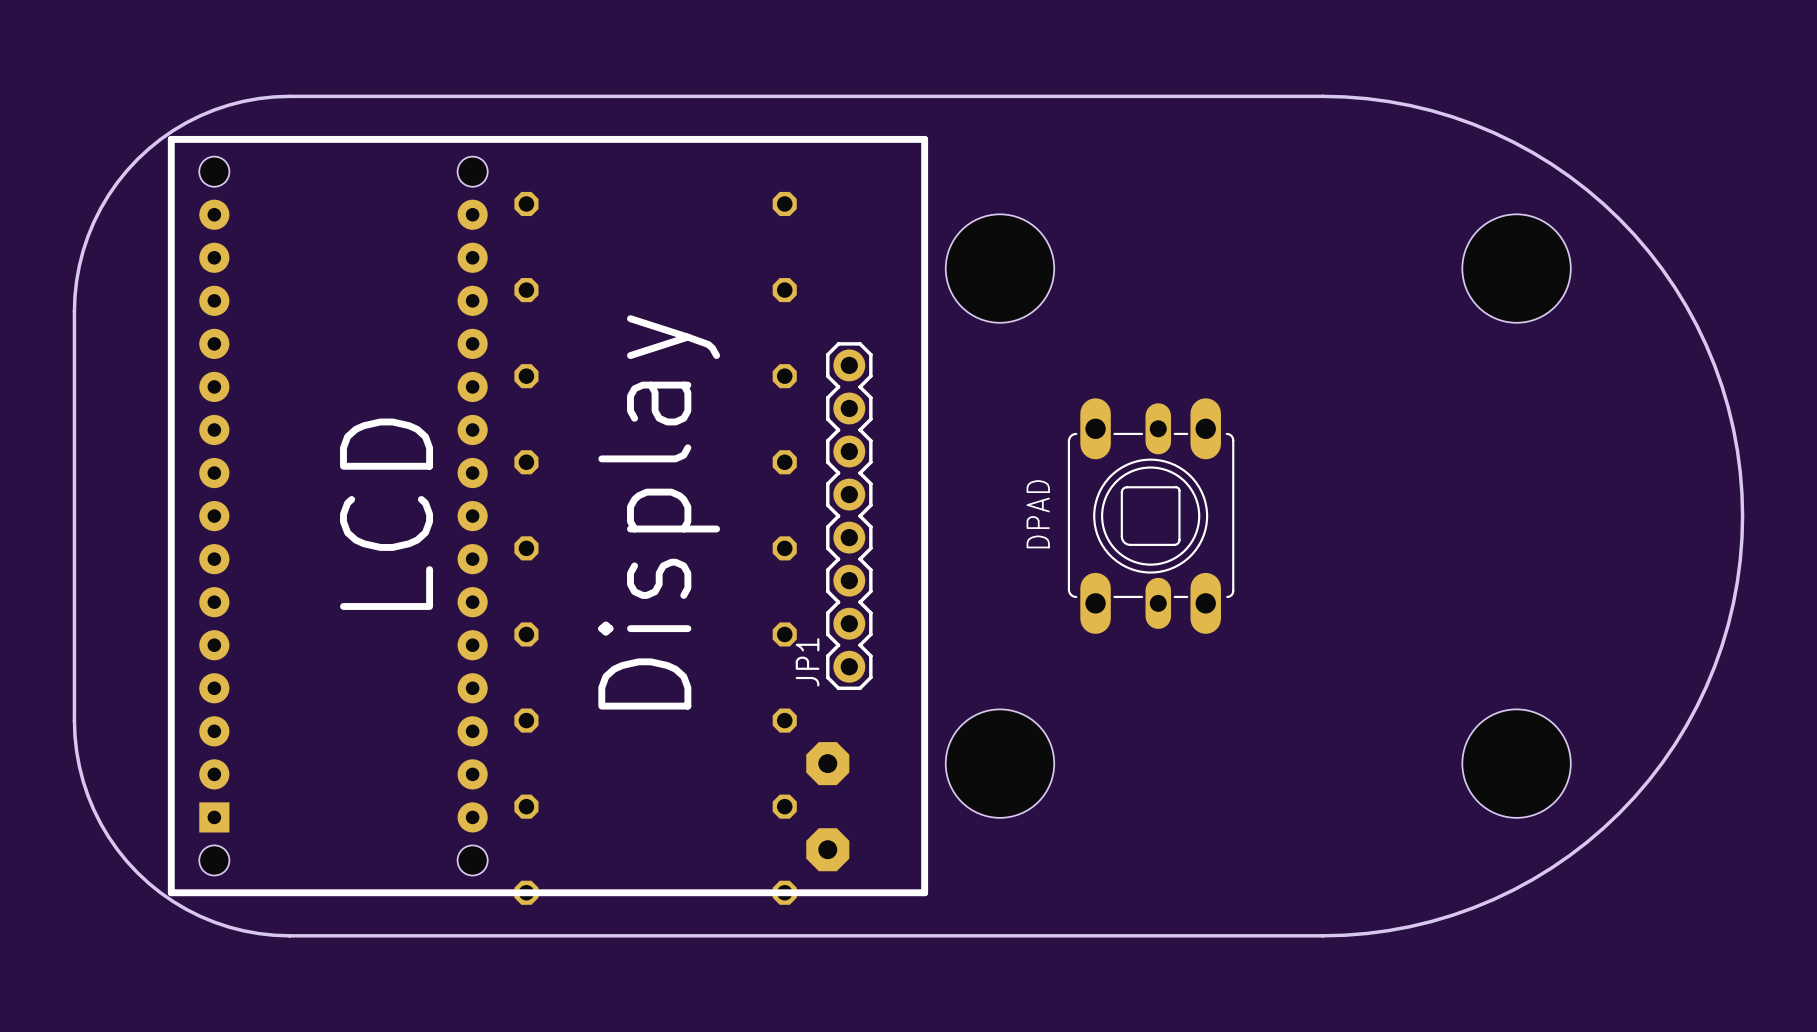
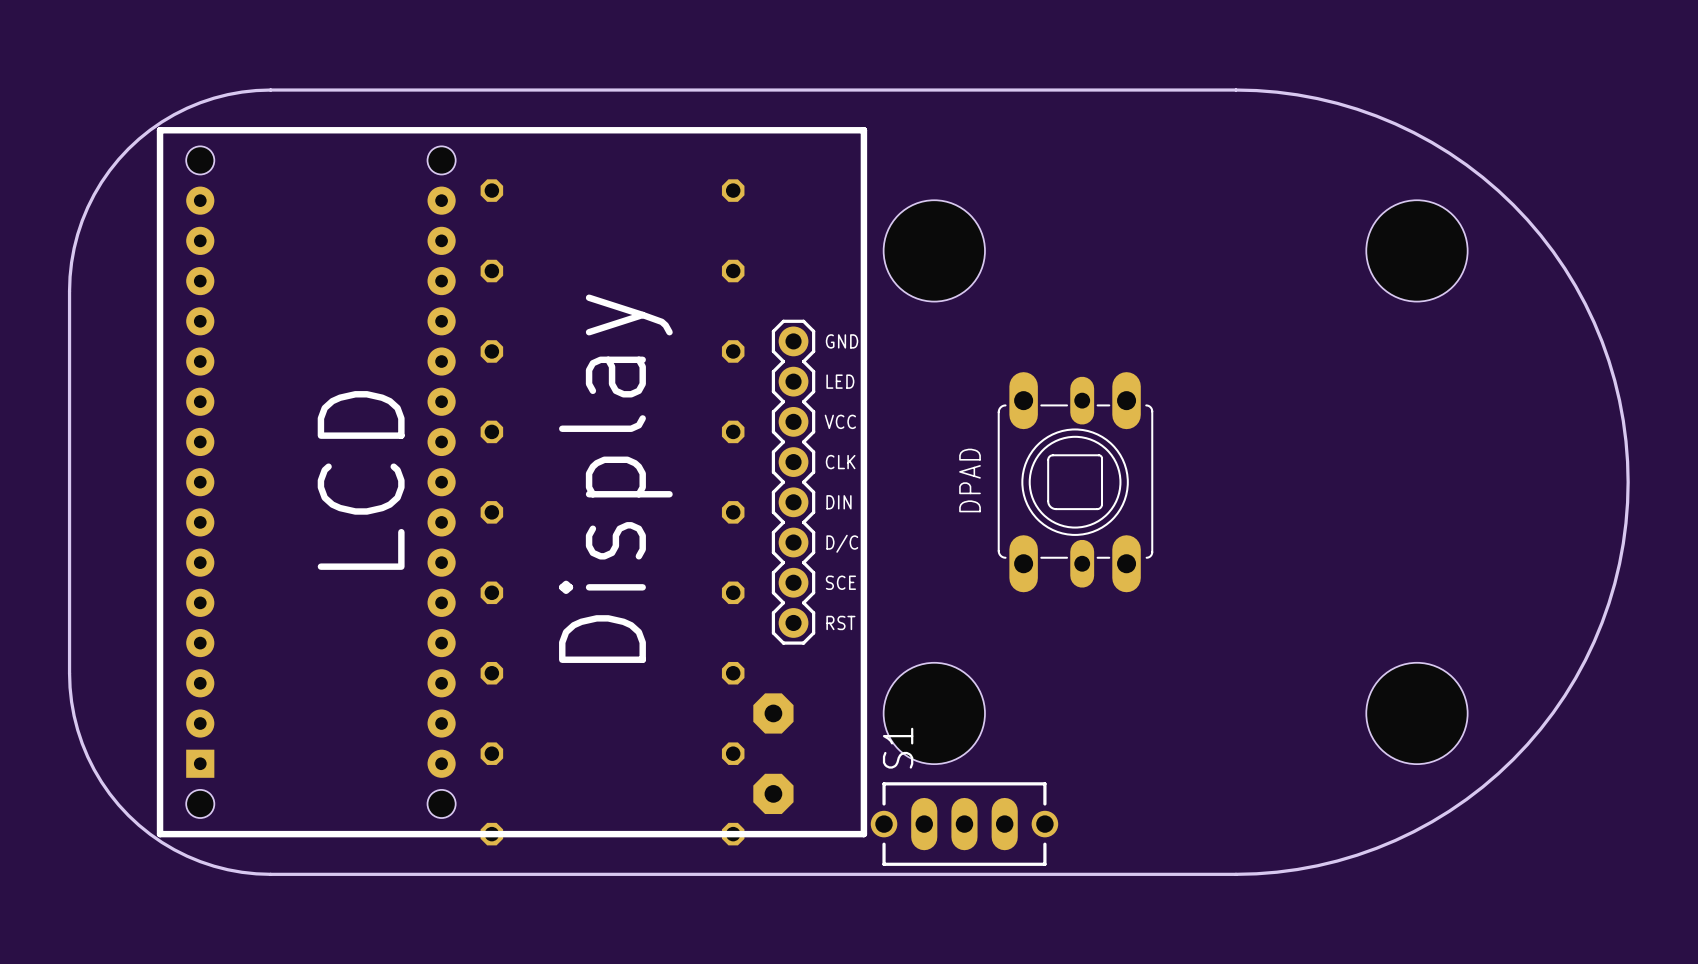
text: none -> GND (842, 341)
text: none -> LED (840, 381)
text: none -> VCC (840, 421)
text: none -> CLK (840, 462)
text: none -> DIN (838, 502)
text: none -> D/C (842, 543)
text: none -> SCE (840, 582)
JP1 name: JP1 (807, 662) -> none
text: none -> RST (840, 622)
S1: none -> (964, 824)

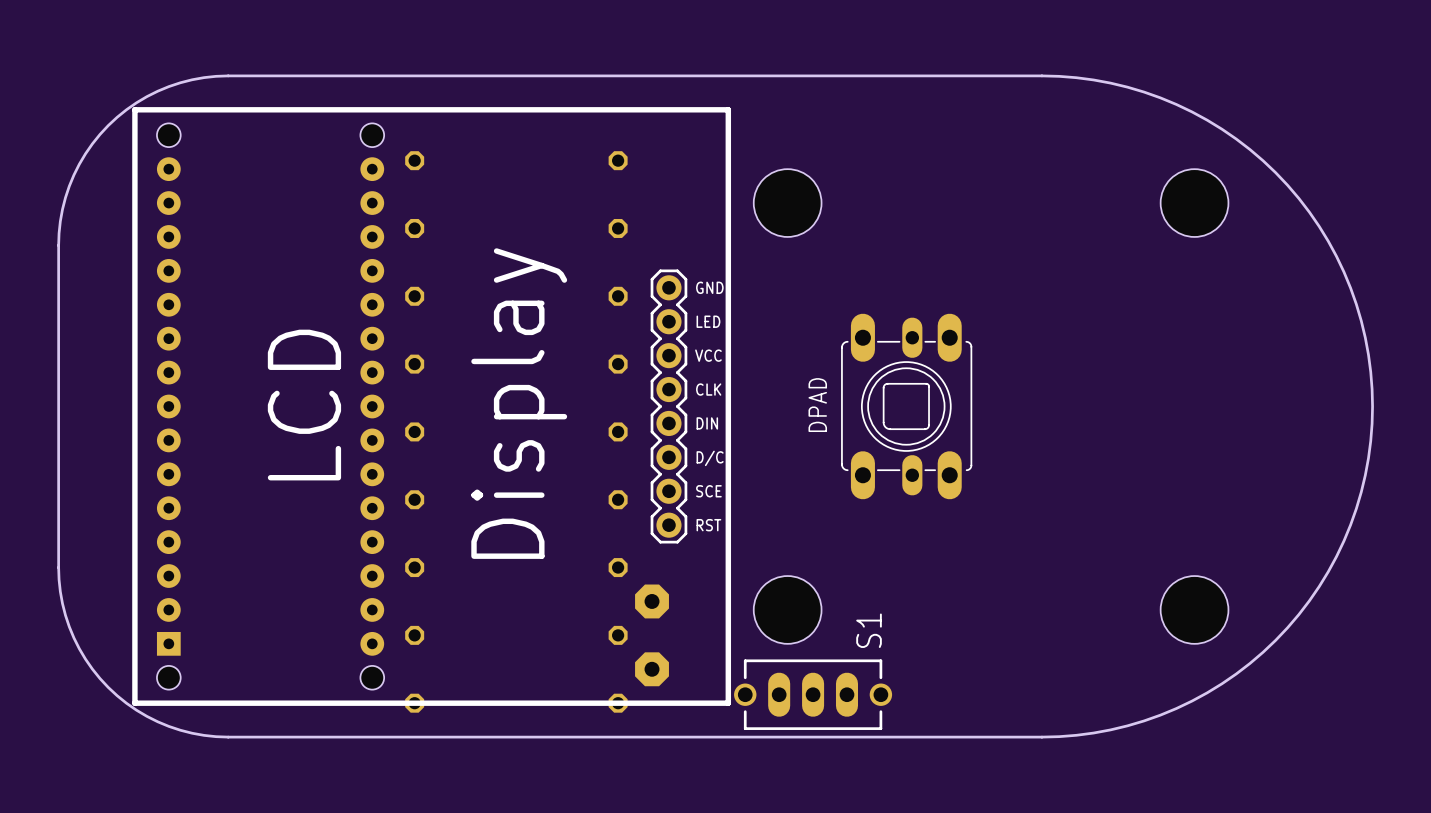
hole size: [883, 200, 985, 302] -> [753, 169, 822, 237]
hole size: [1366, 200, 1468, 302] -> [1160, 169, 1229, 237]
hole size: [883, 662, 985, 765] -> [753, 576, 822, 644]
hole size: [1366, 662, 1468, 765] -> [1160, 576, 1229, 644]
S1 name position: S1 (898, 748) -> S1 (869, 630)

